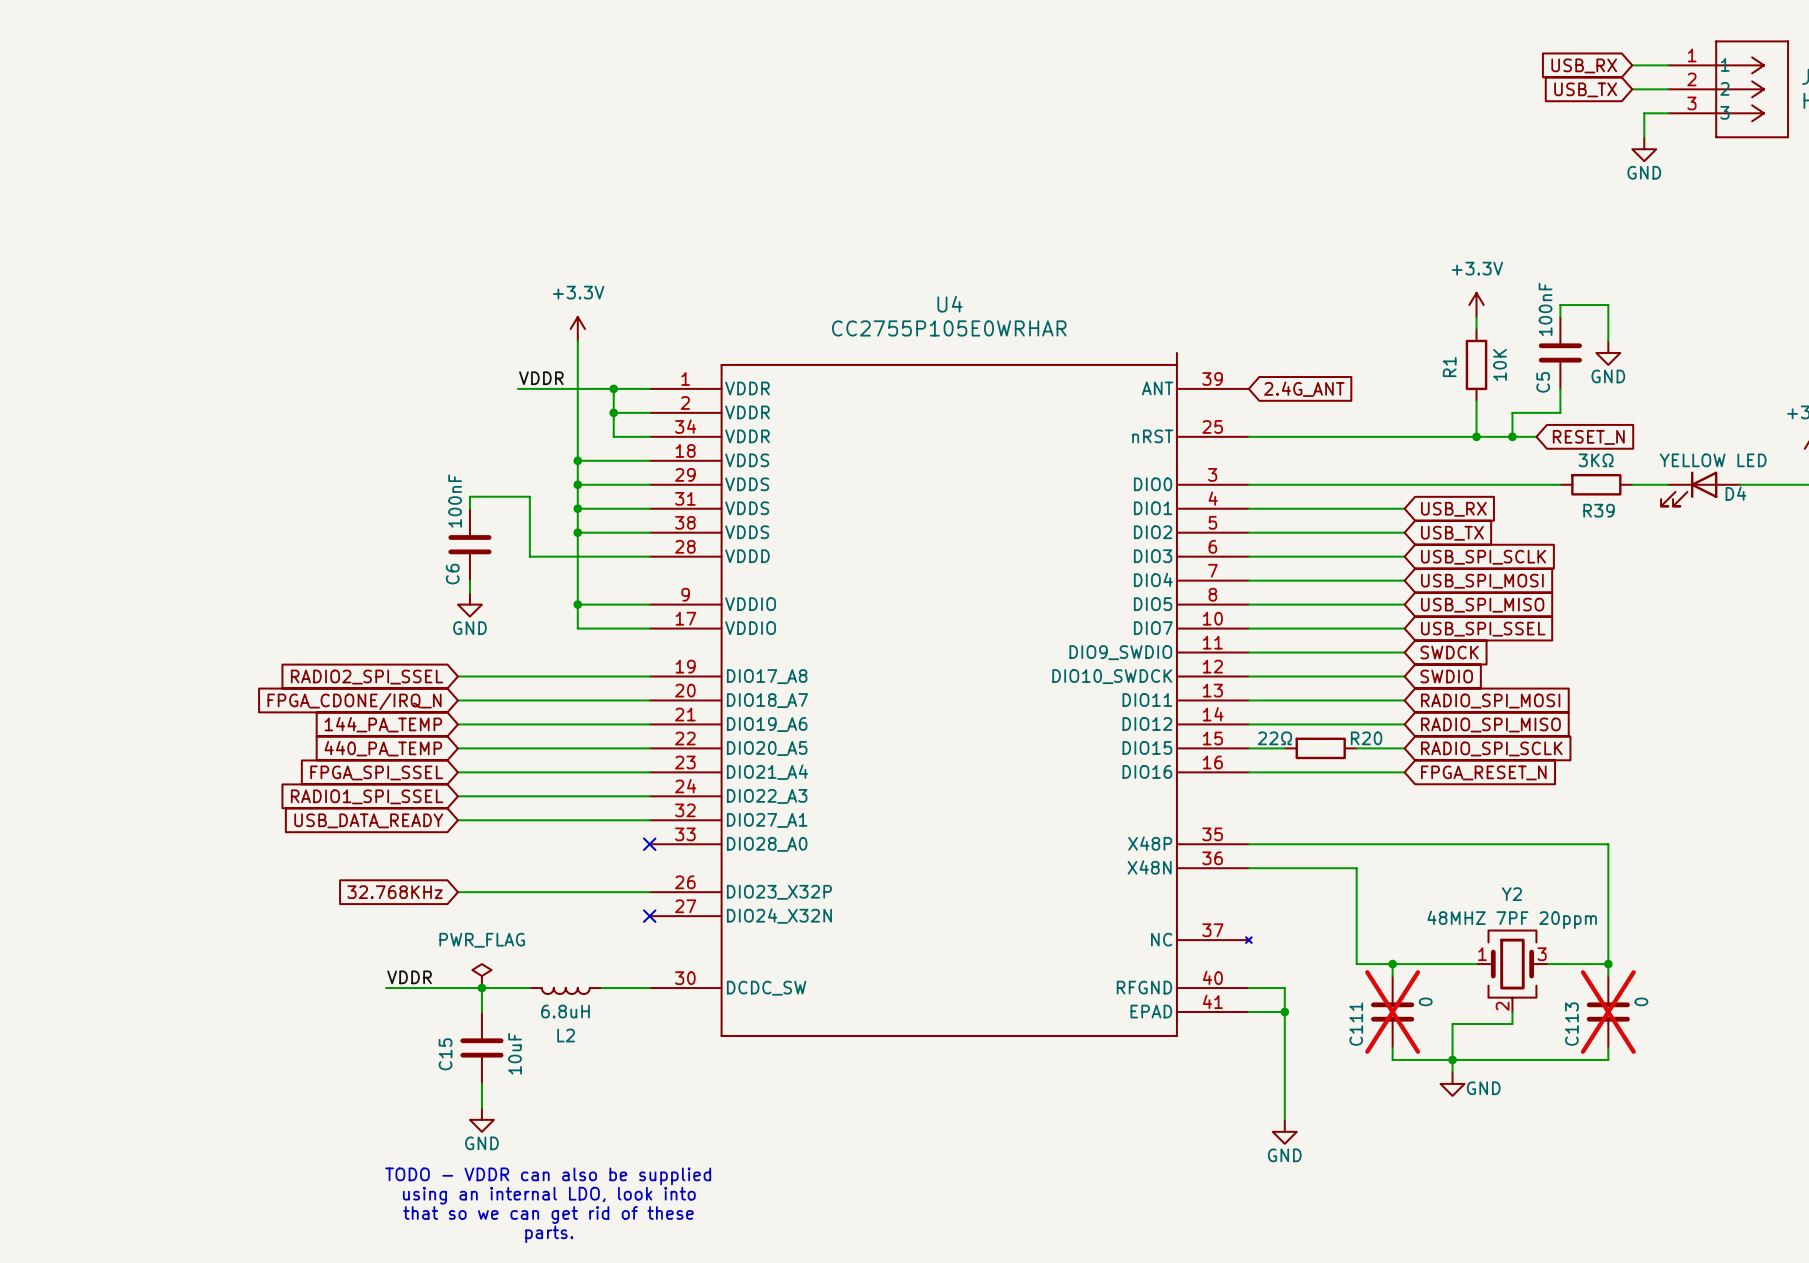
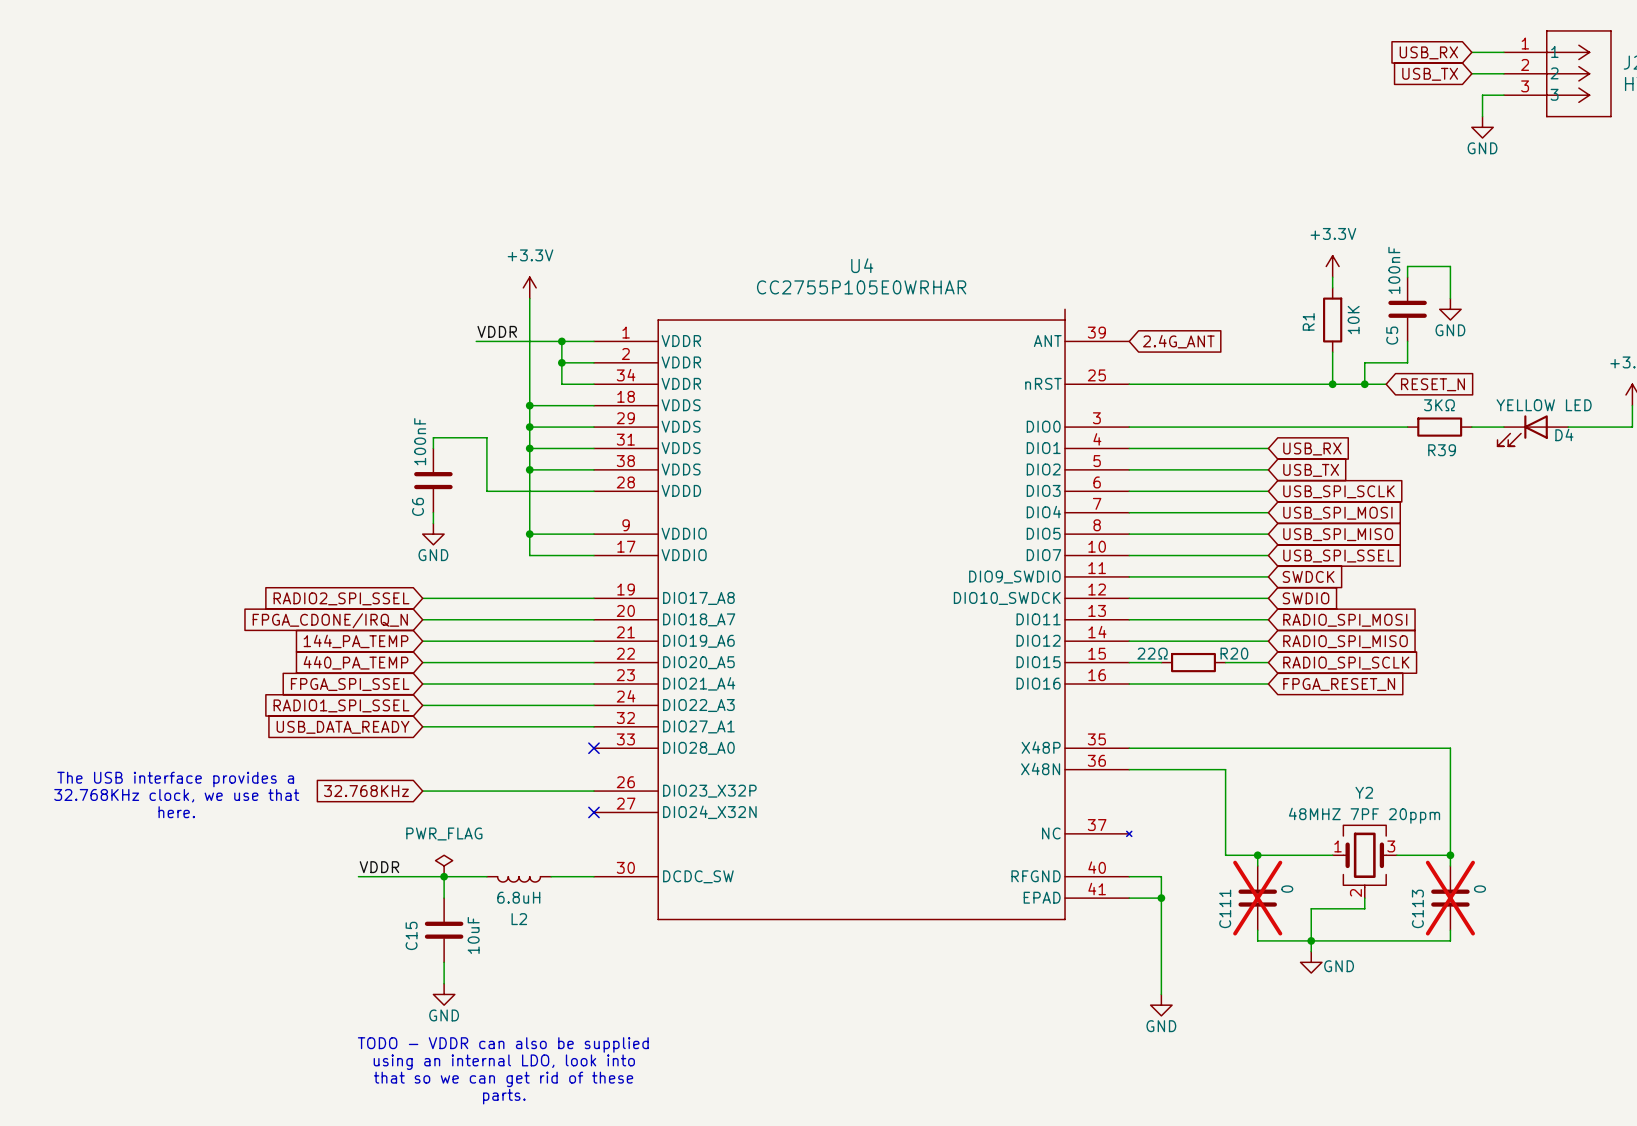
text: none -> The USB interface provides a (175, 779)
text: none -> 32.768KHz clock, we use that (176, 795)
text: none -> here. (176, 812)

